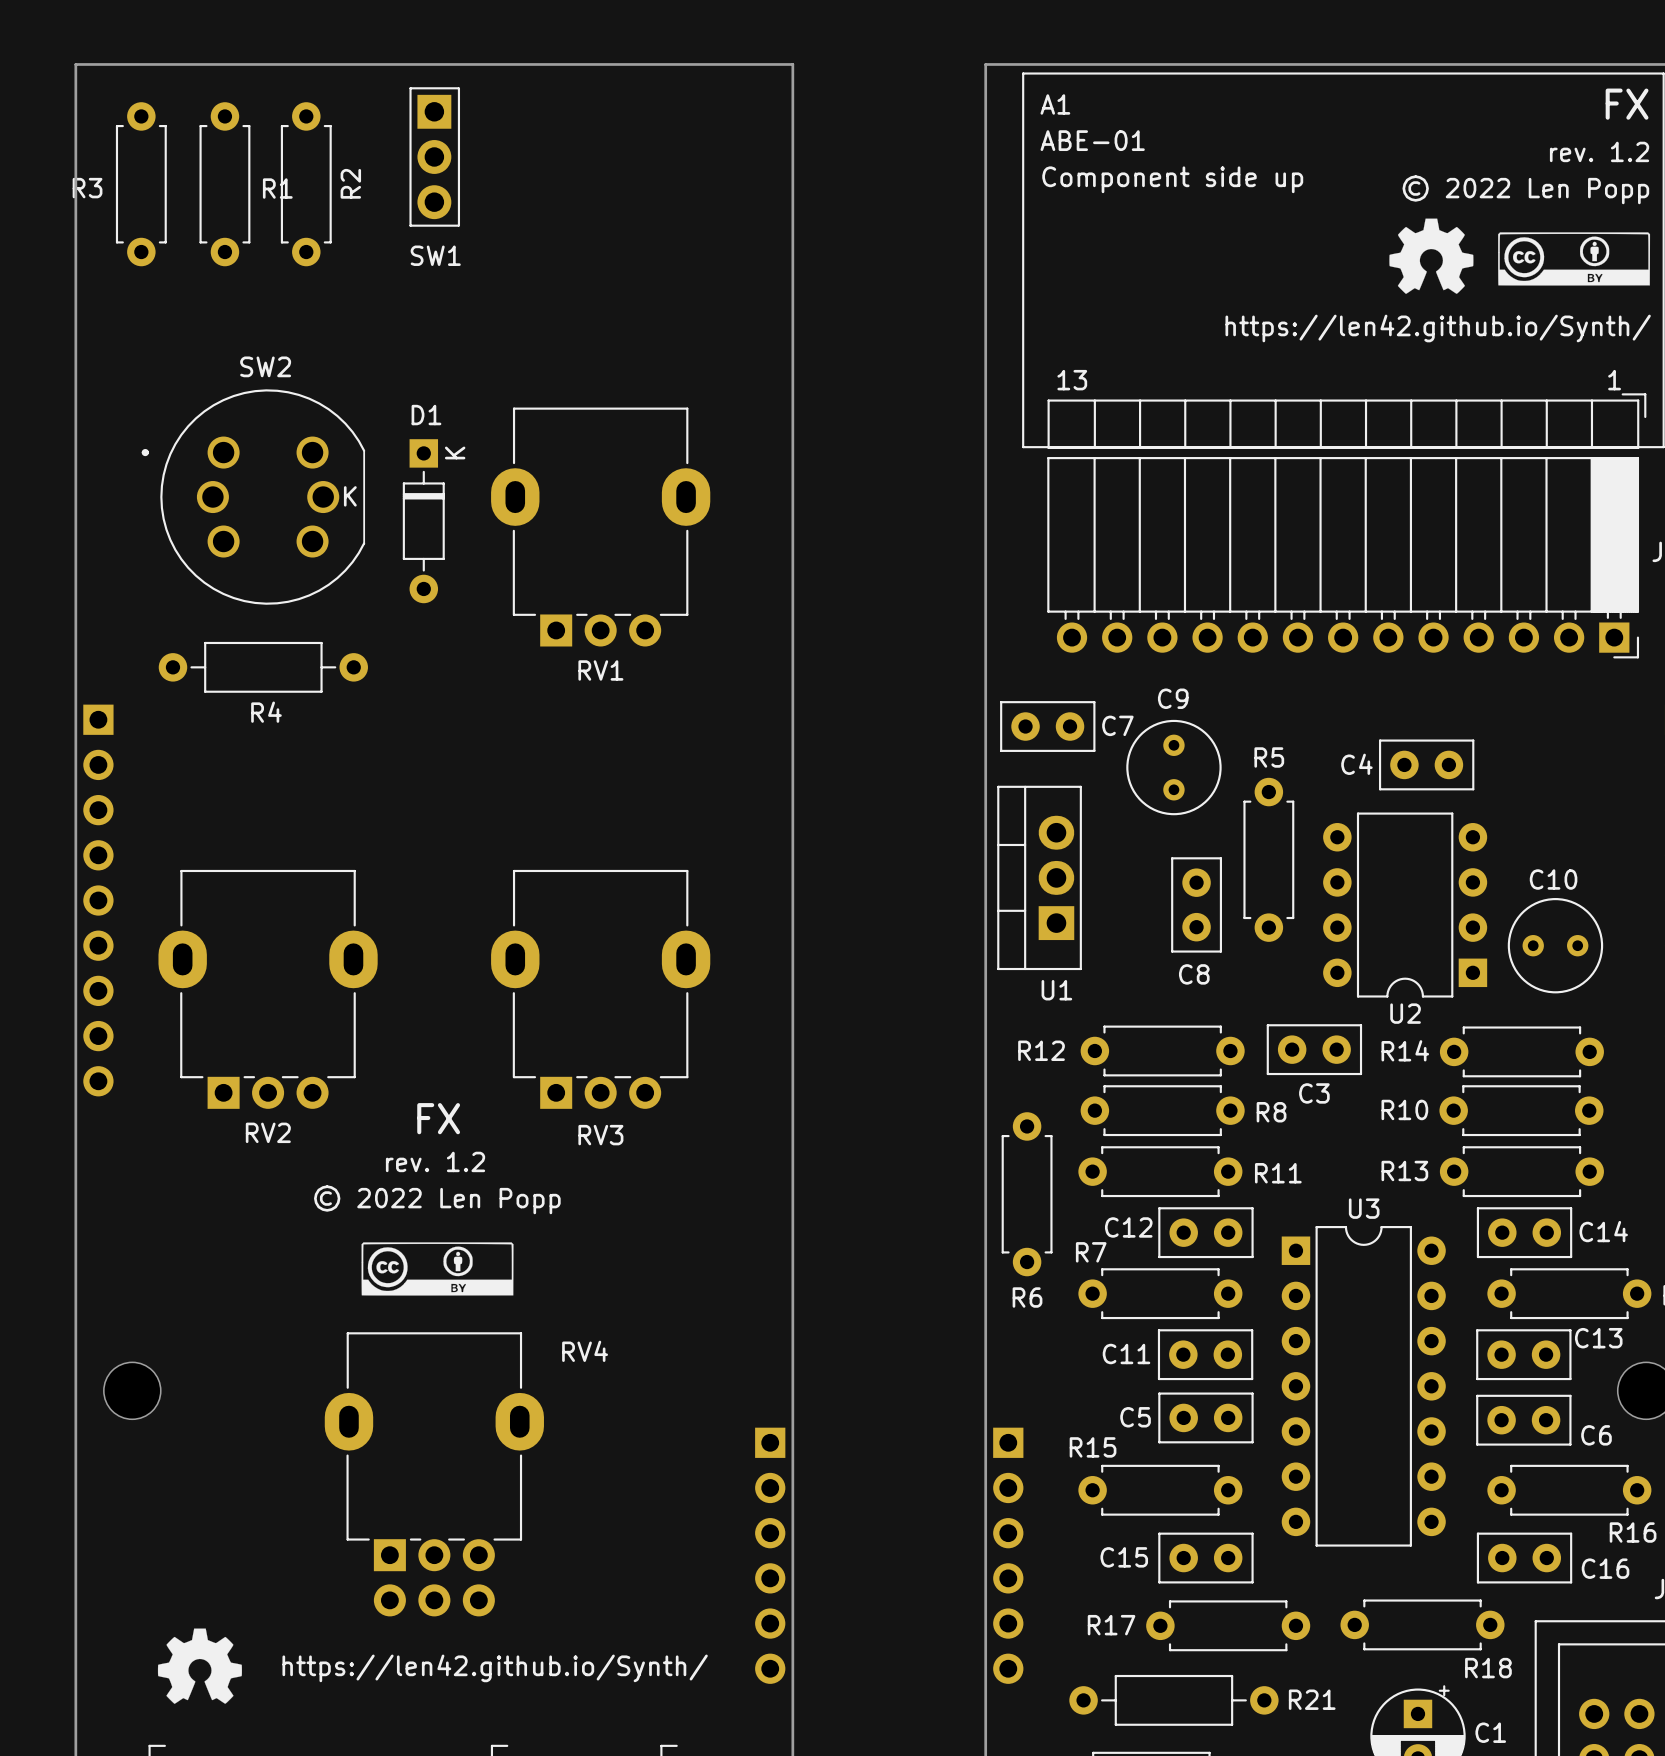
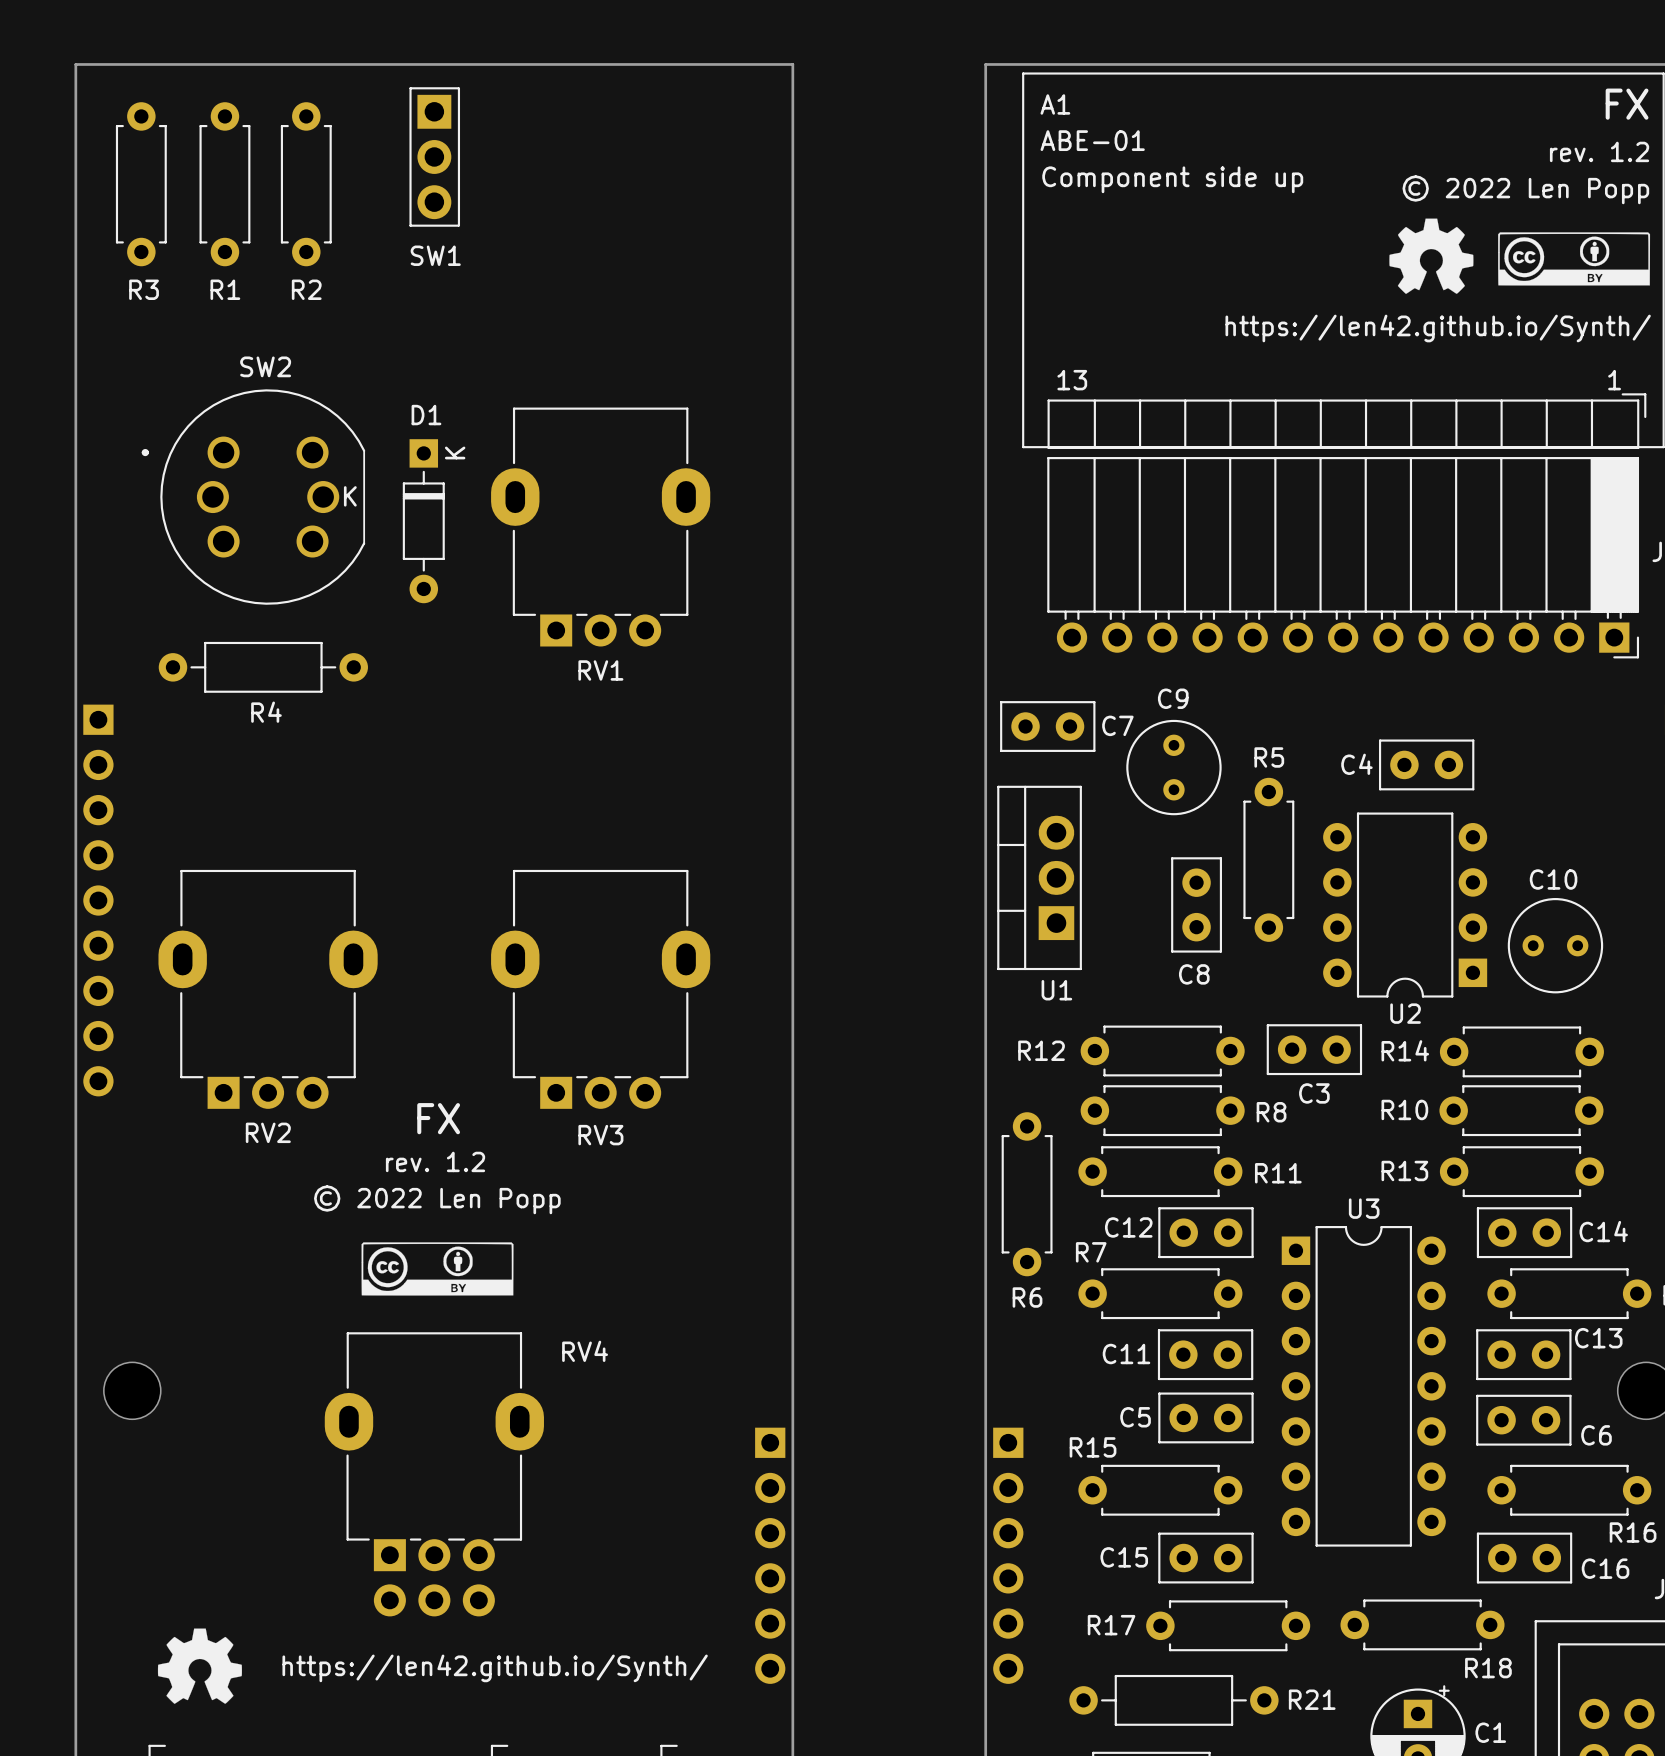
R2 name rotation: 0° (350, 183) -> 90° clockwise (306, 289)
R2 name position: R2 (350, 183) -> R2 (306, 289)
R3 name position: R3 (87, 188) -> R3 (144, 289)
R1 name position: R1 (277, 188) -> R1 (225, 289)

